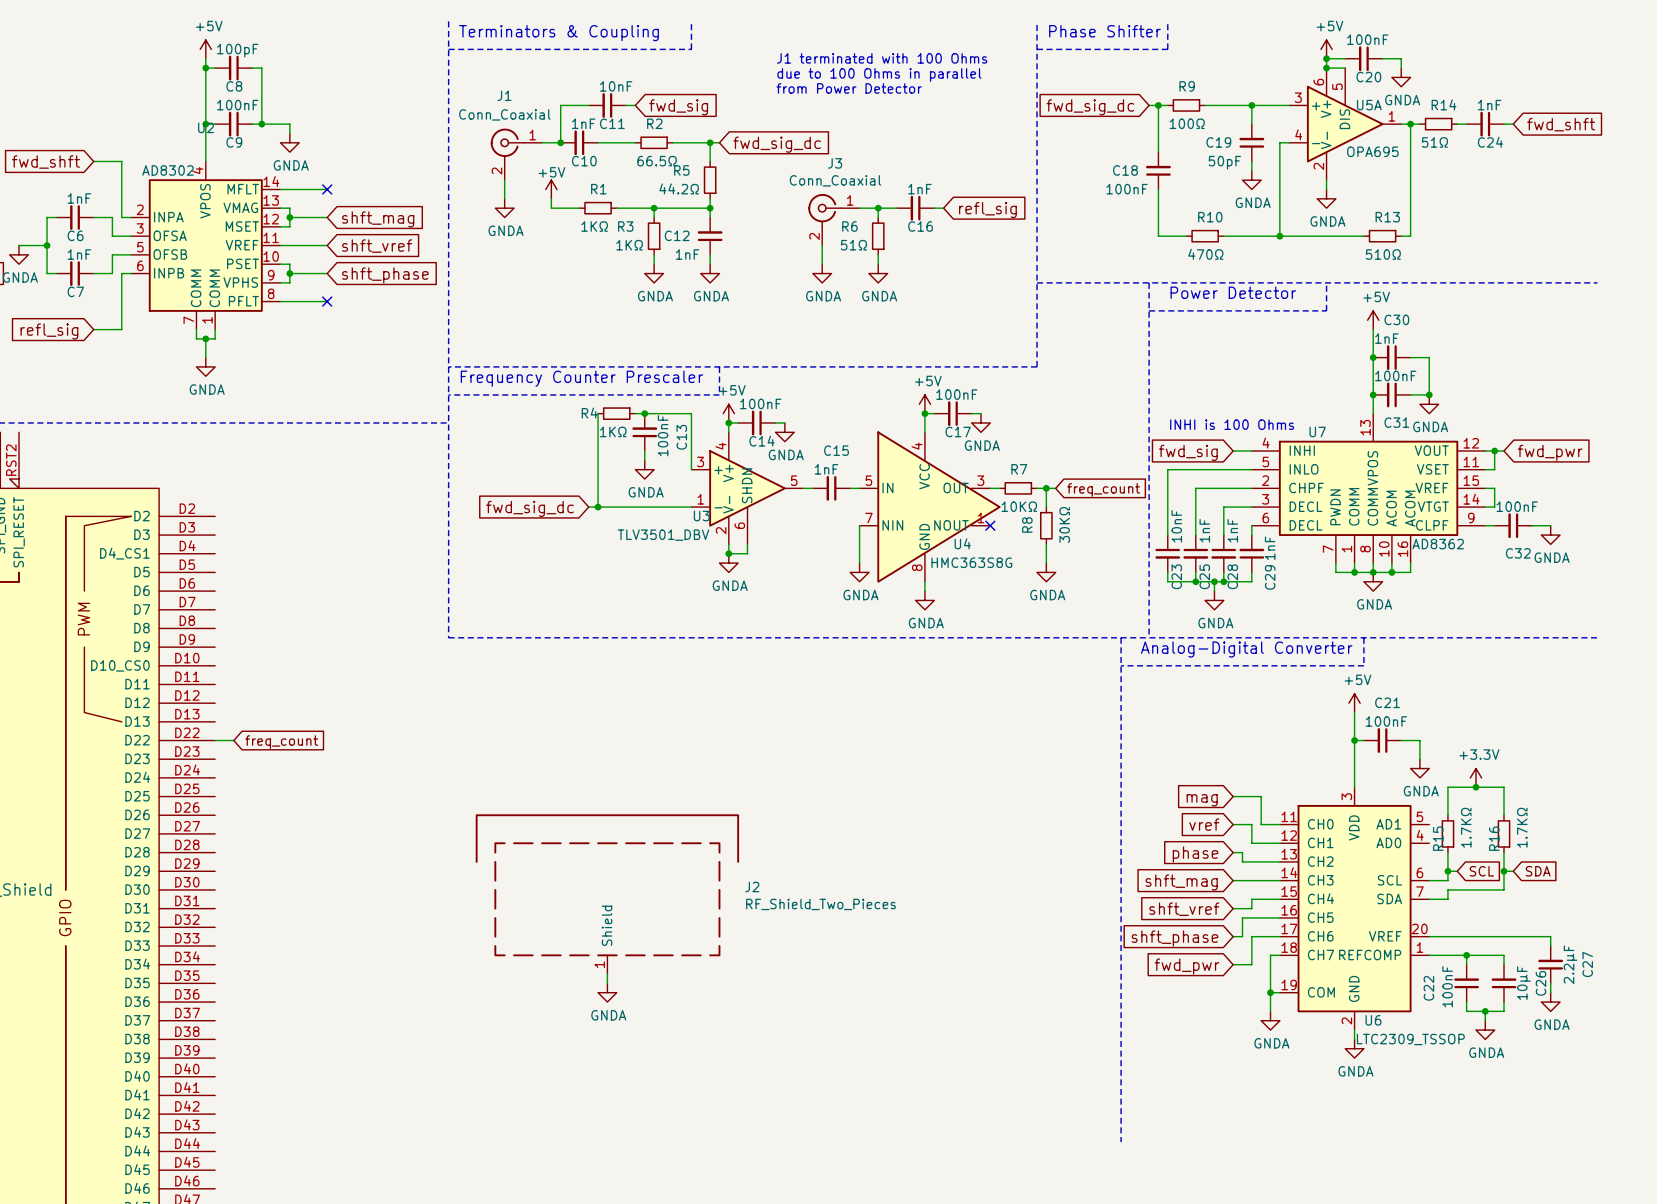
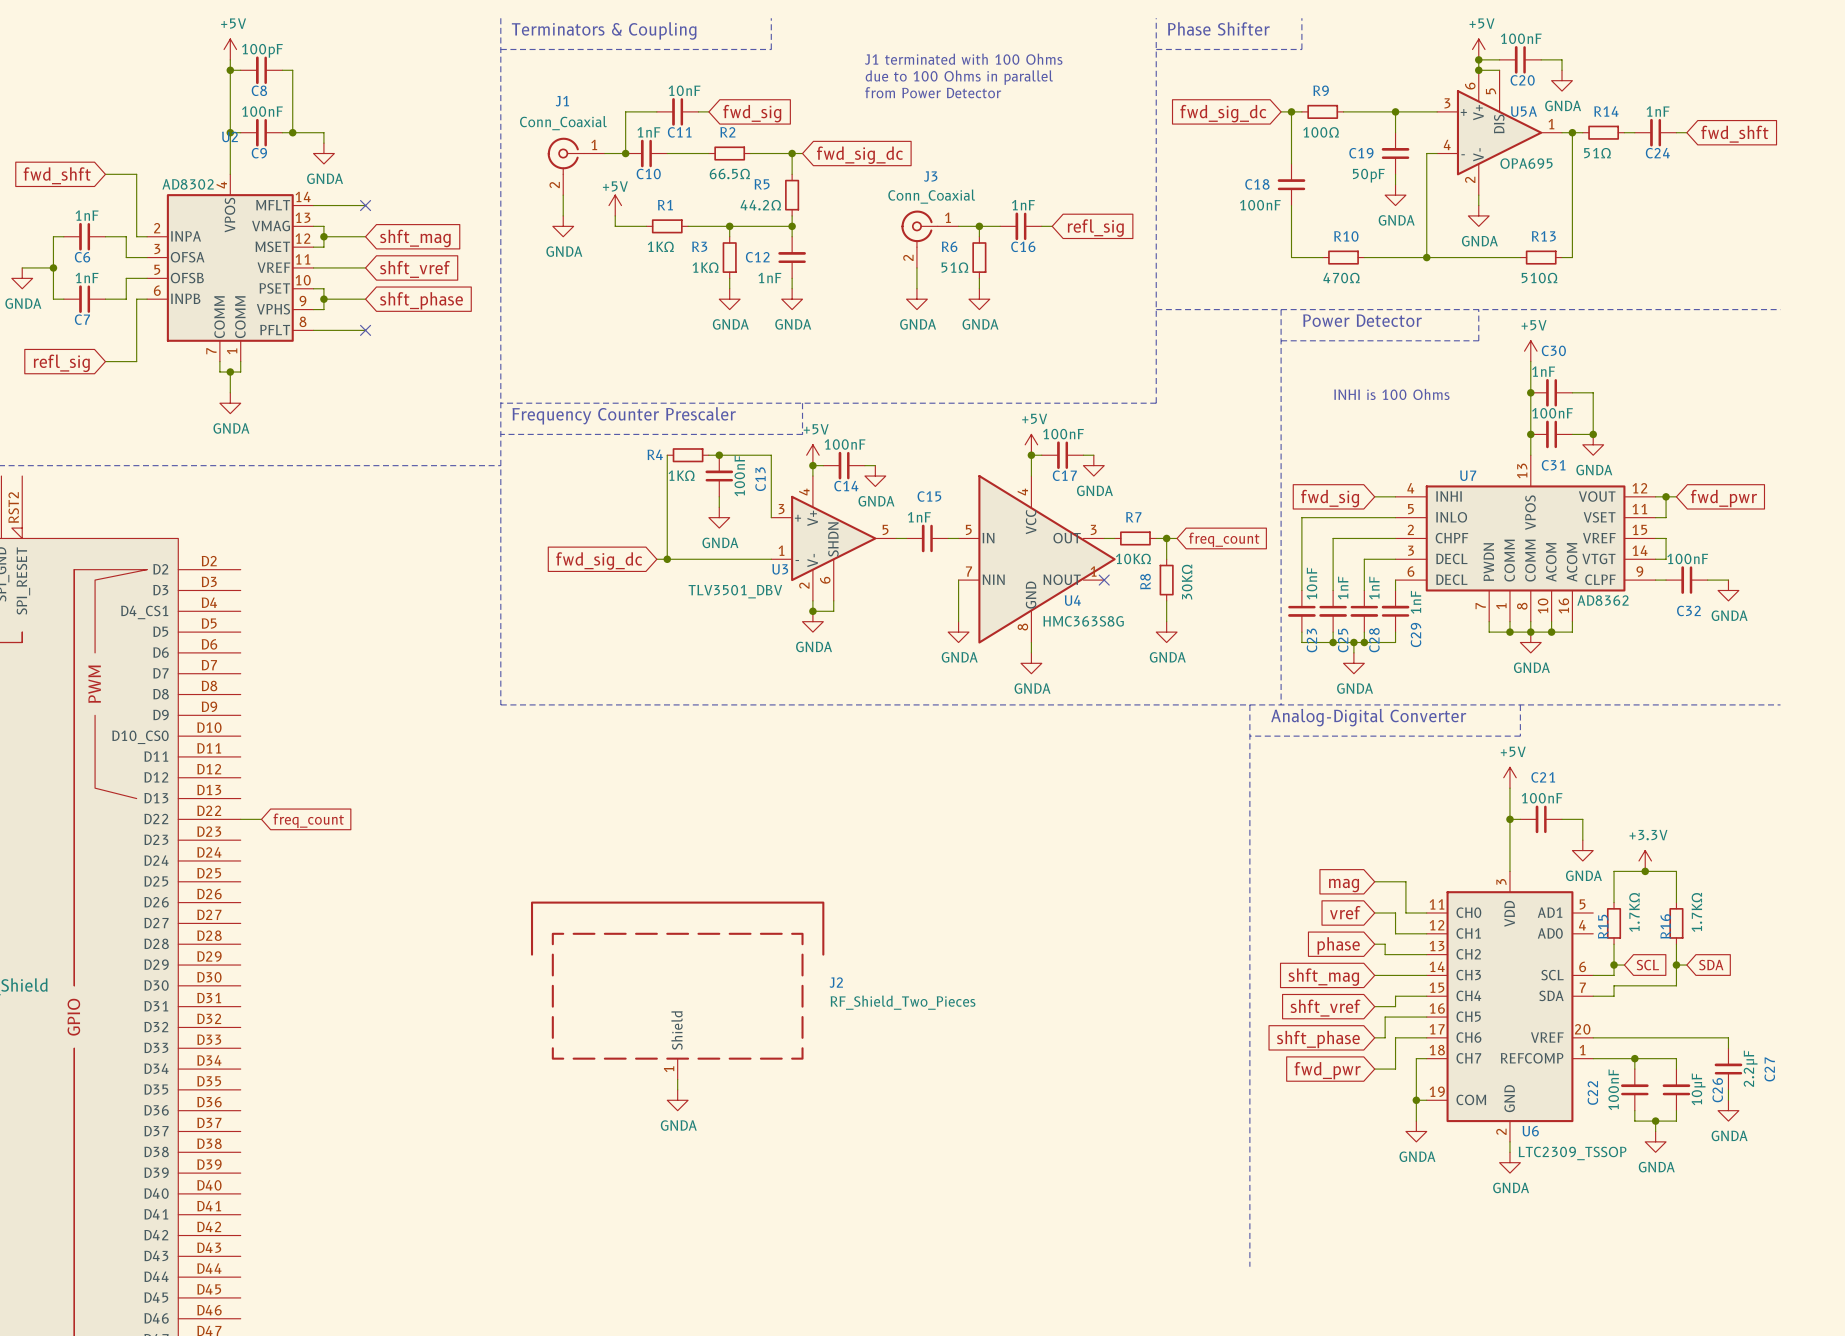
text position: INHI is 100 Ohms (1232, 424) -> INHI is 100 Ohms (1391, 394)

